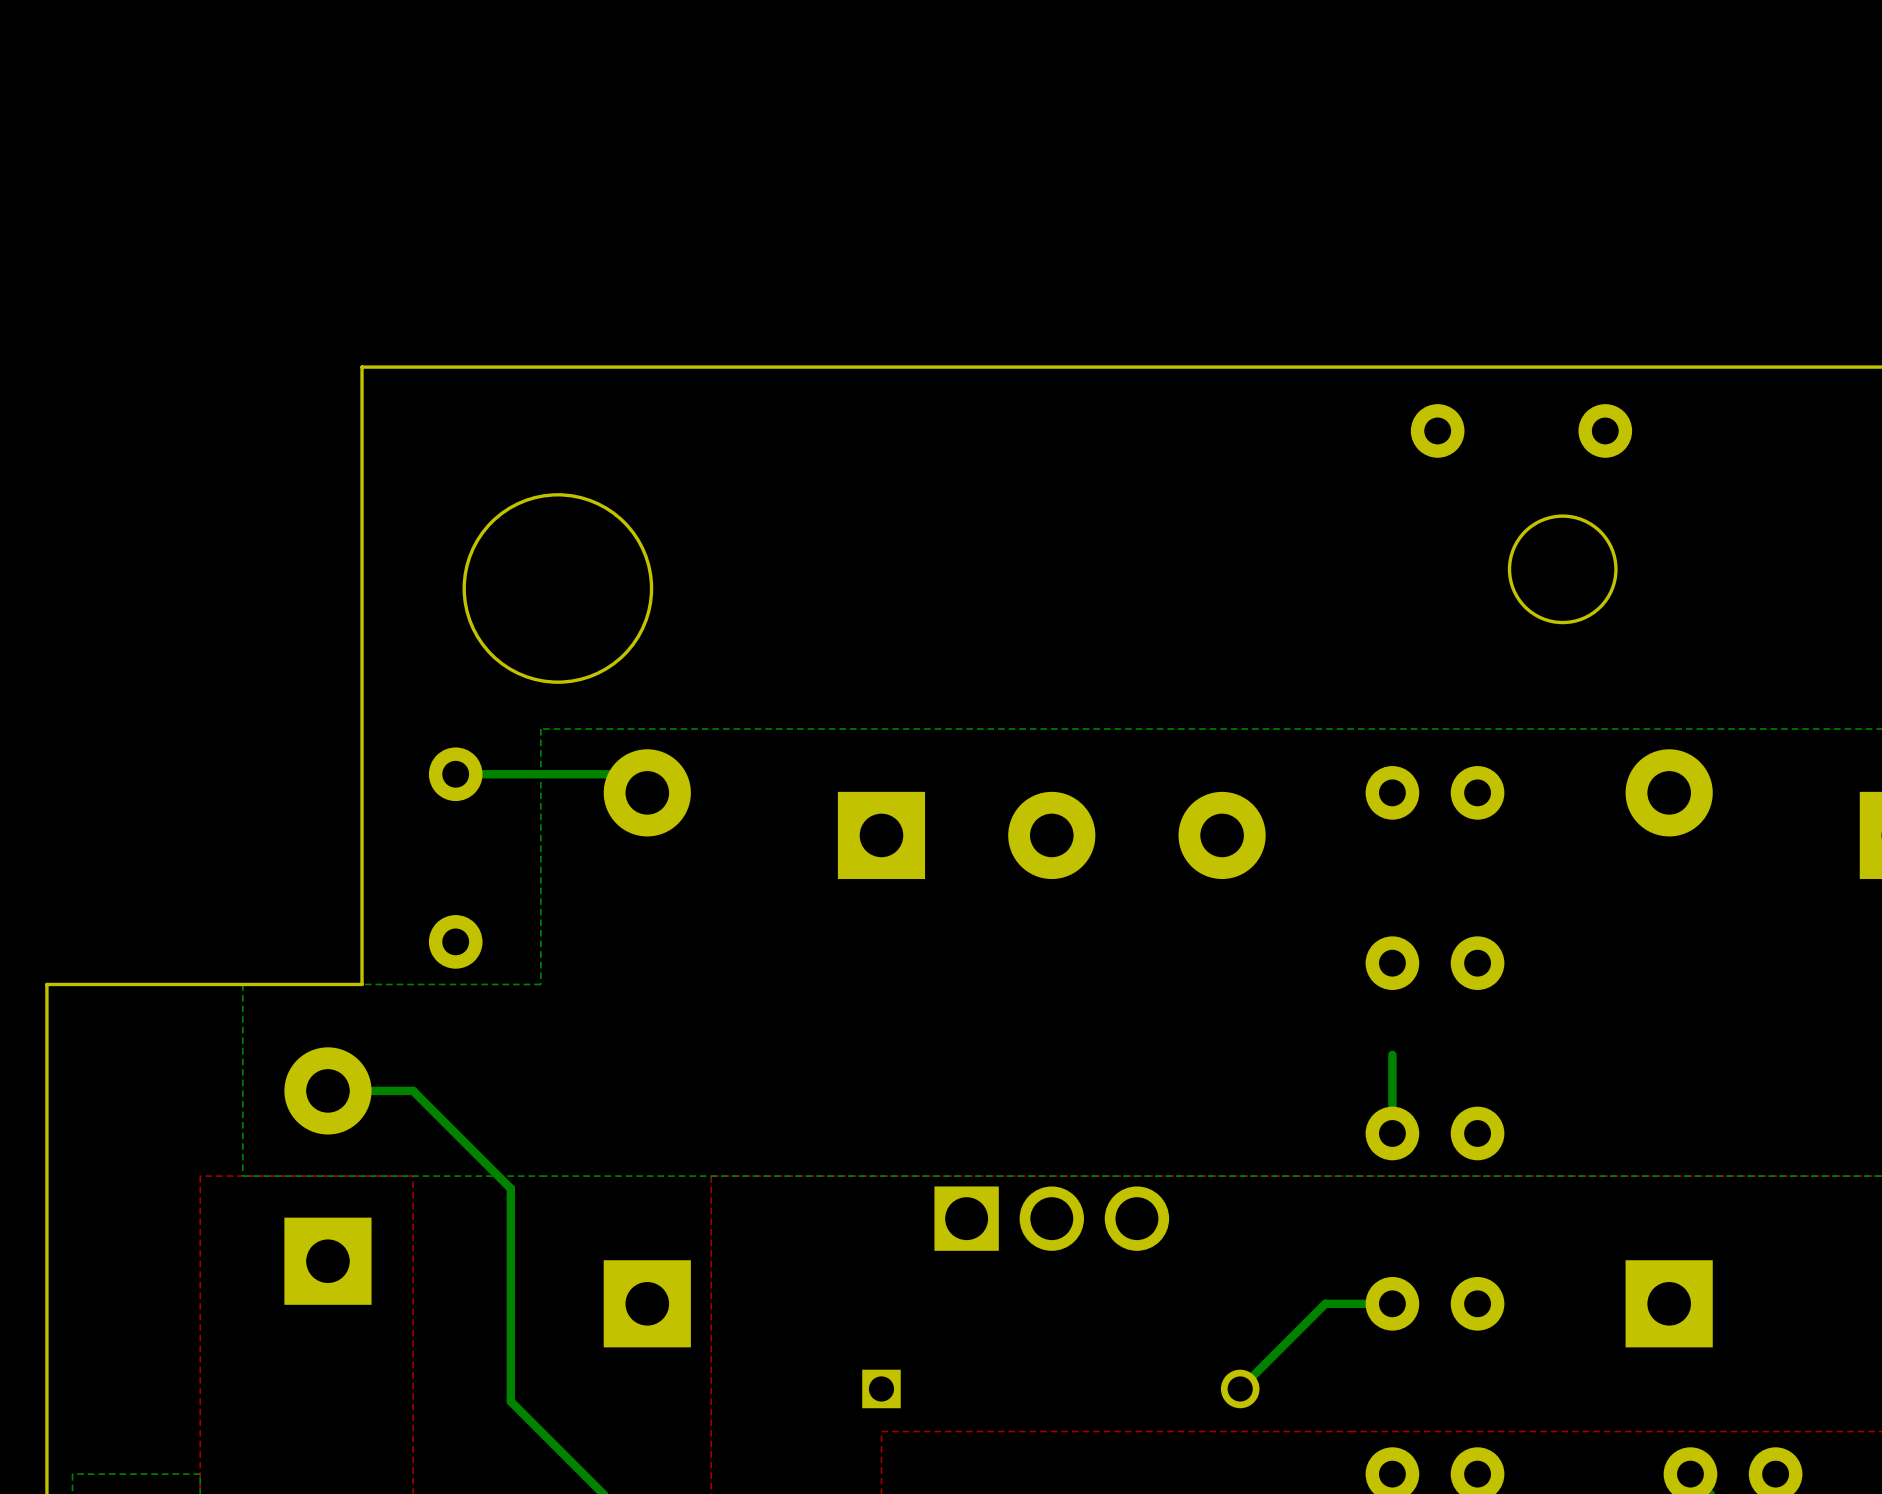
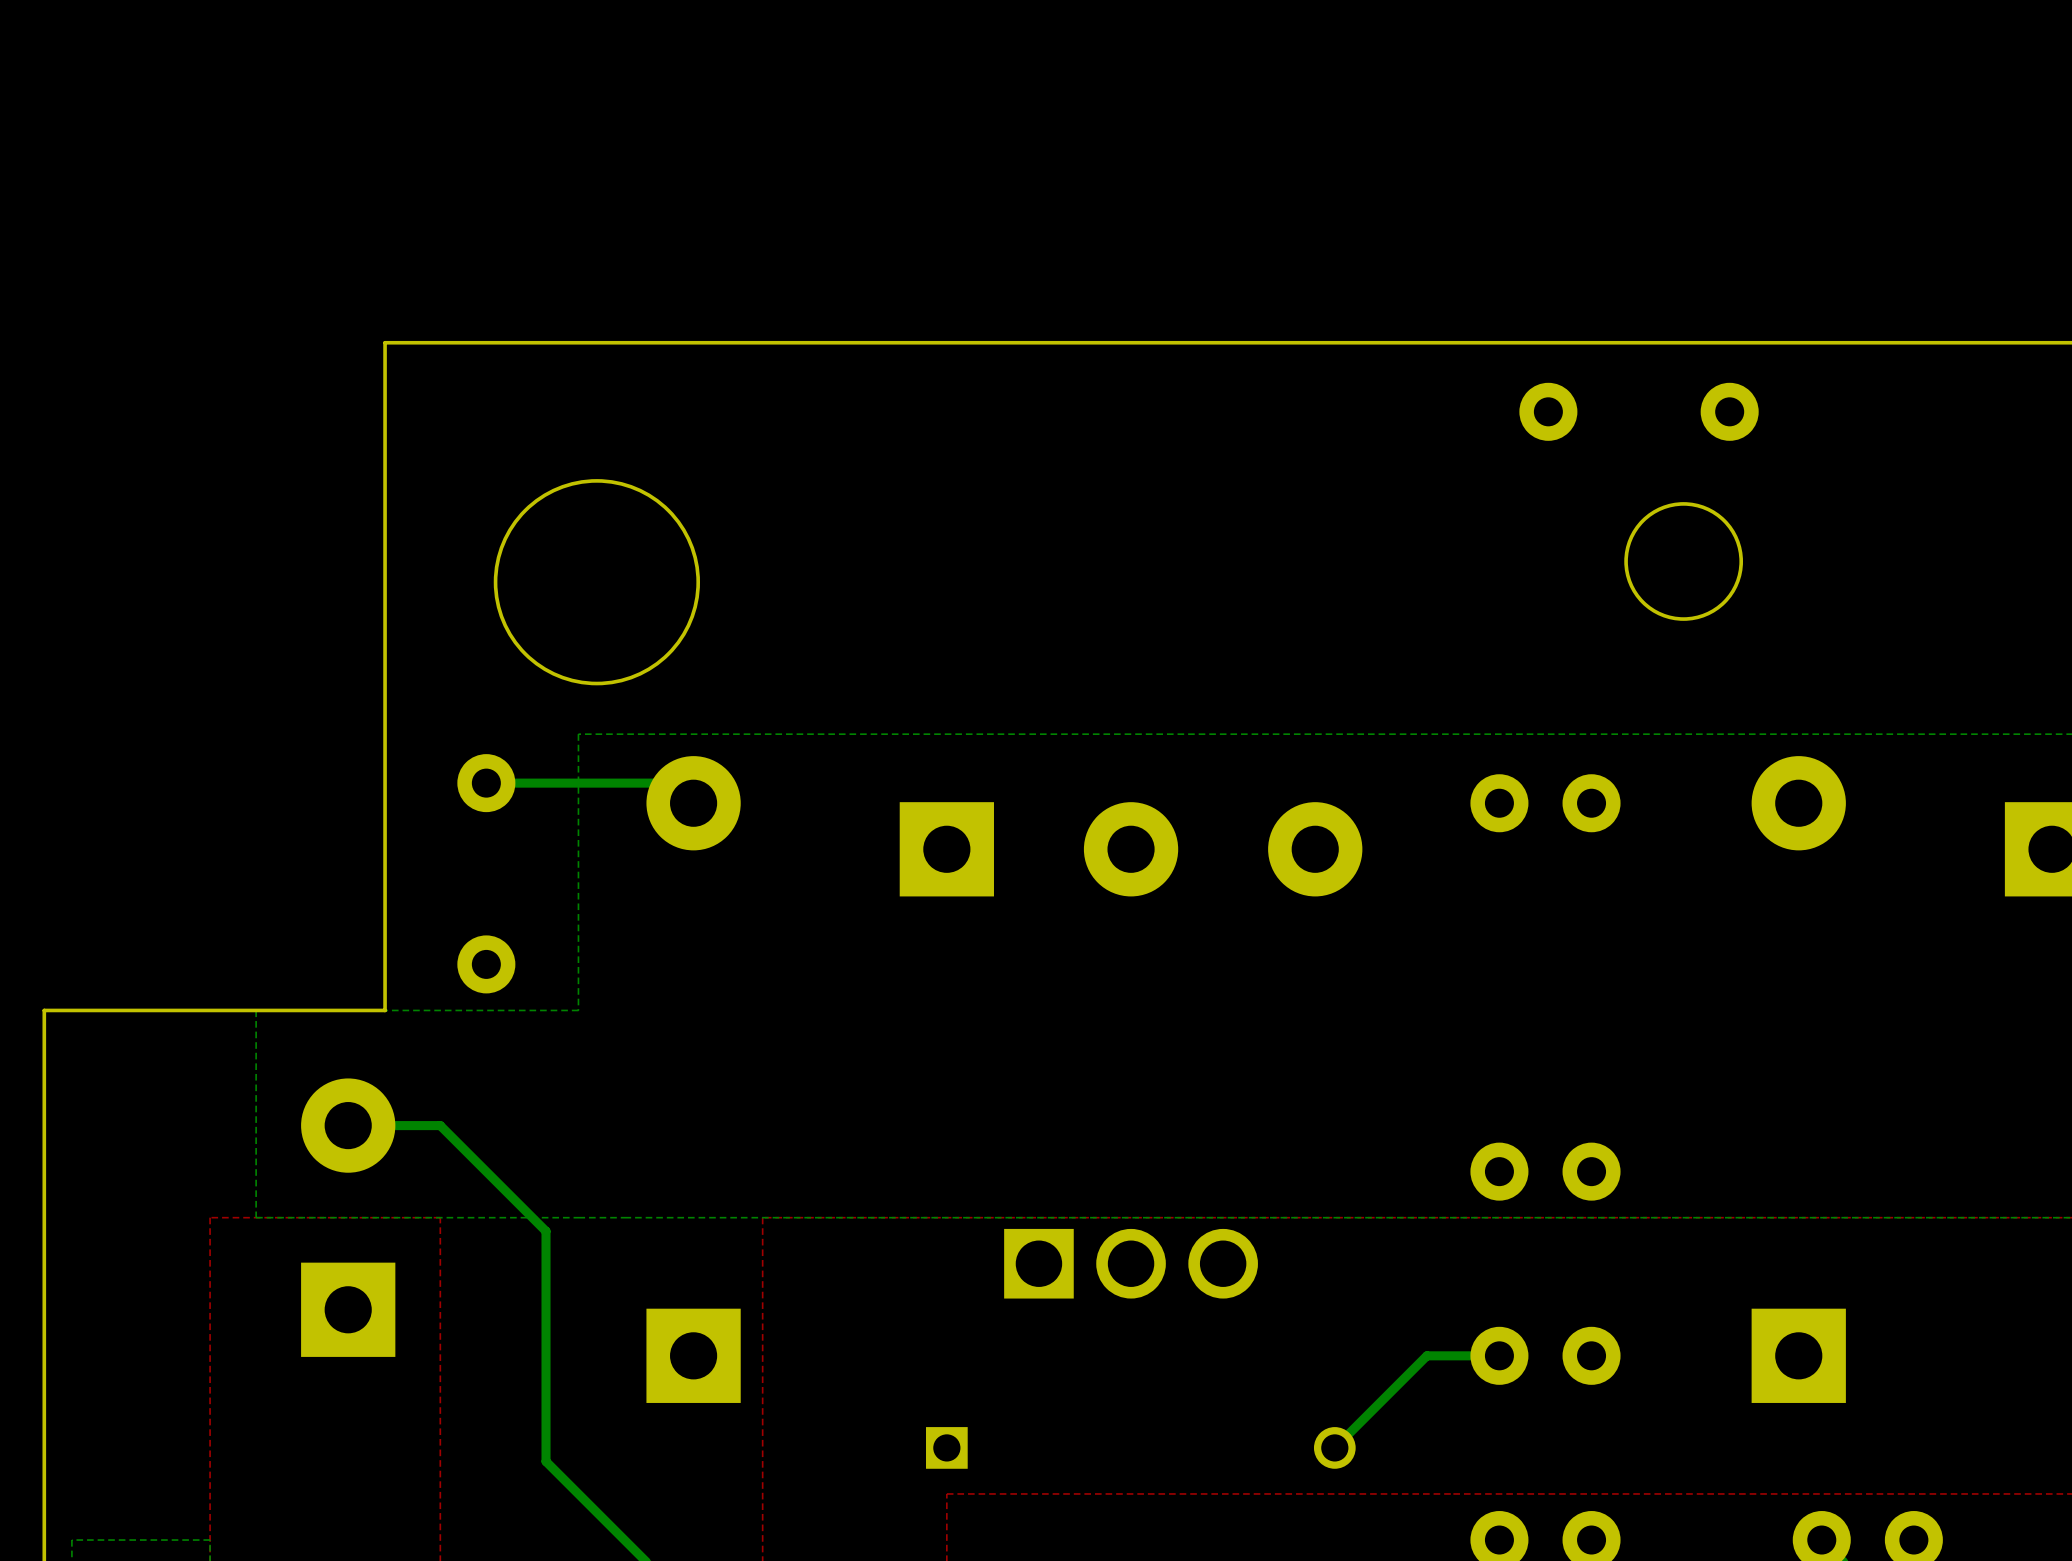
part: (1434, 963) -> none
bottom track: (1392, 1054) (1392, 1133) -> none

